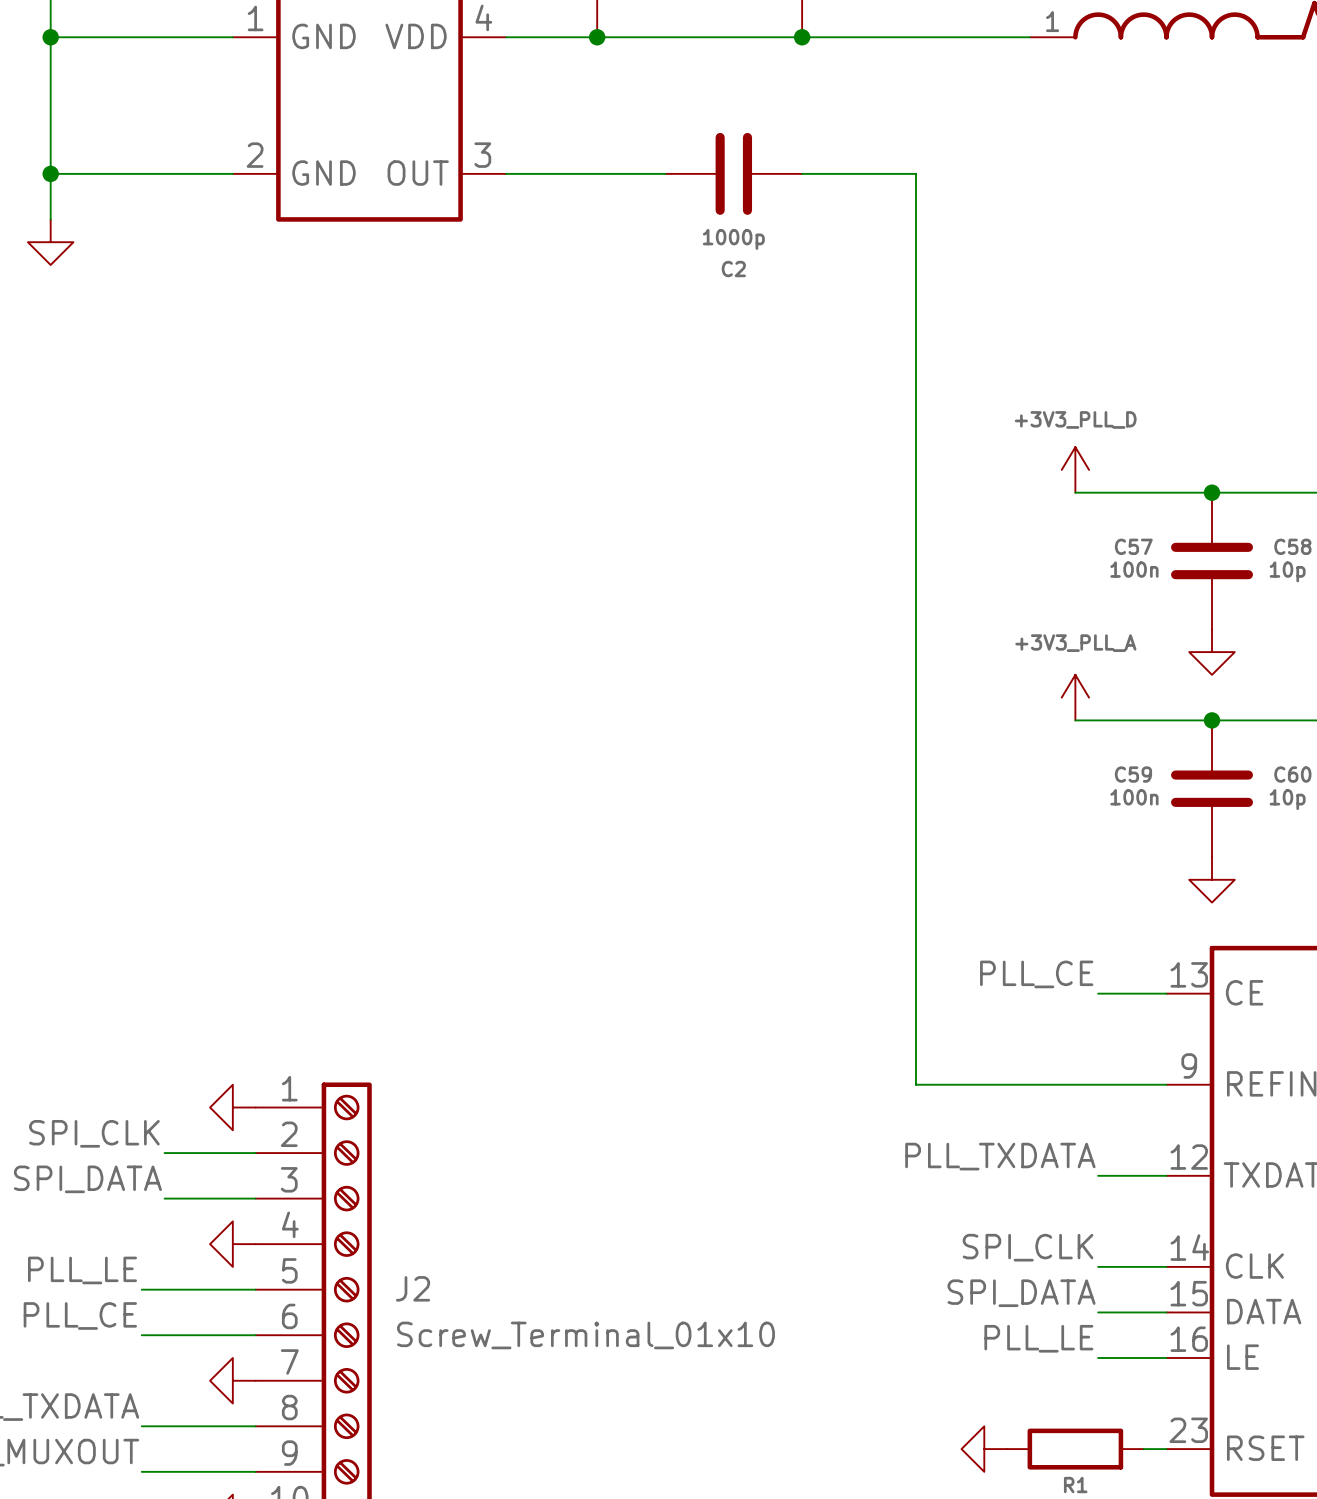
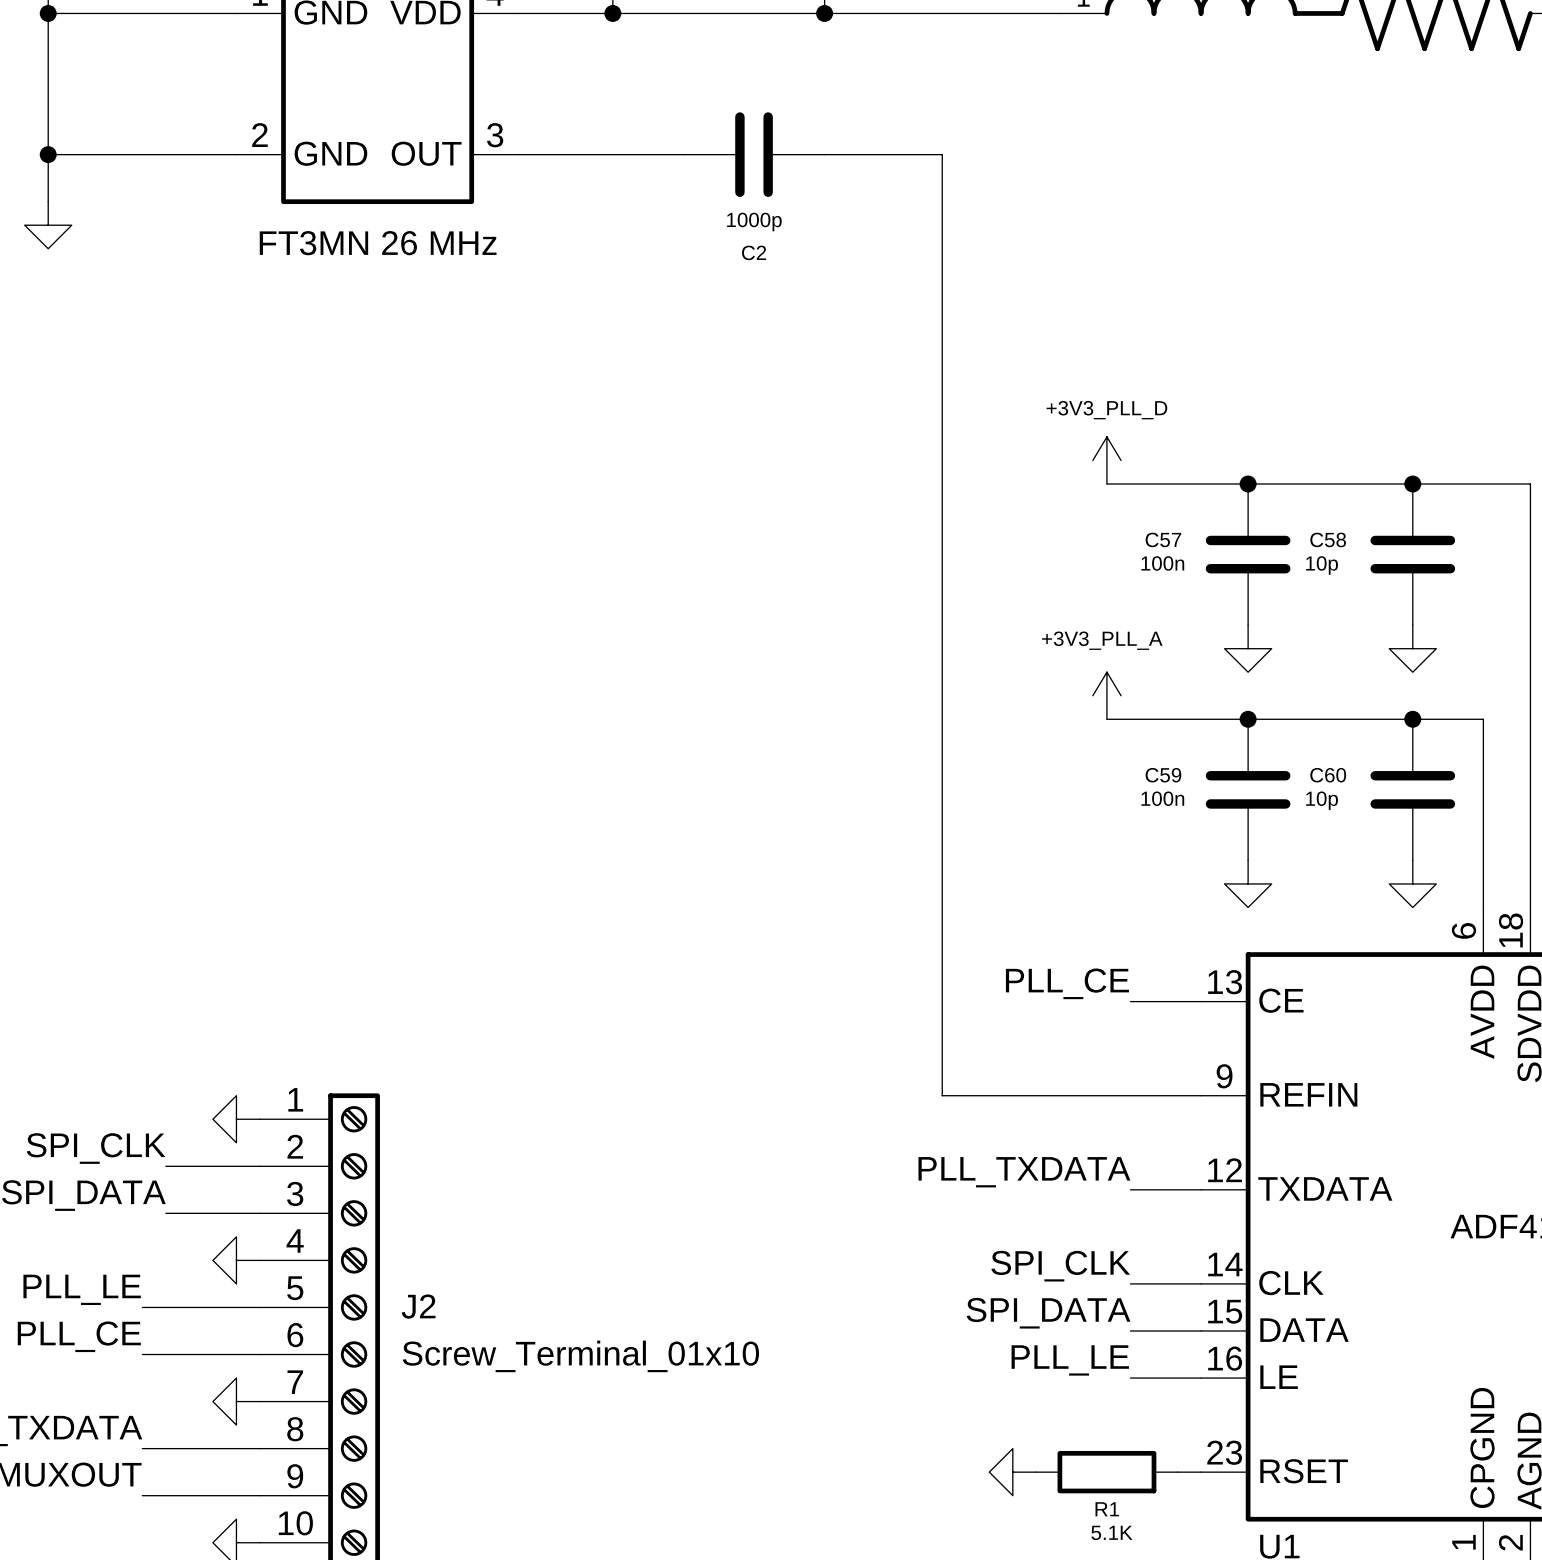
part value: none -> FT3MN 26 MHz (378, 243)

